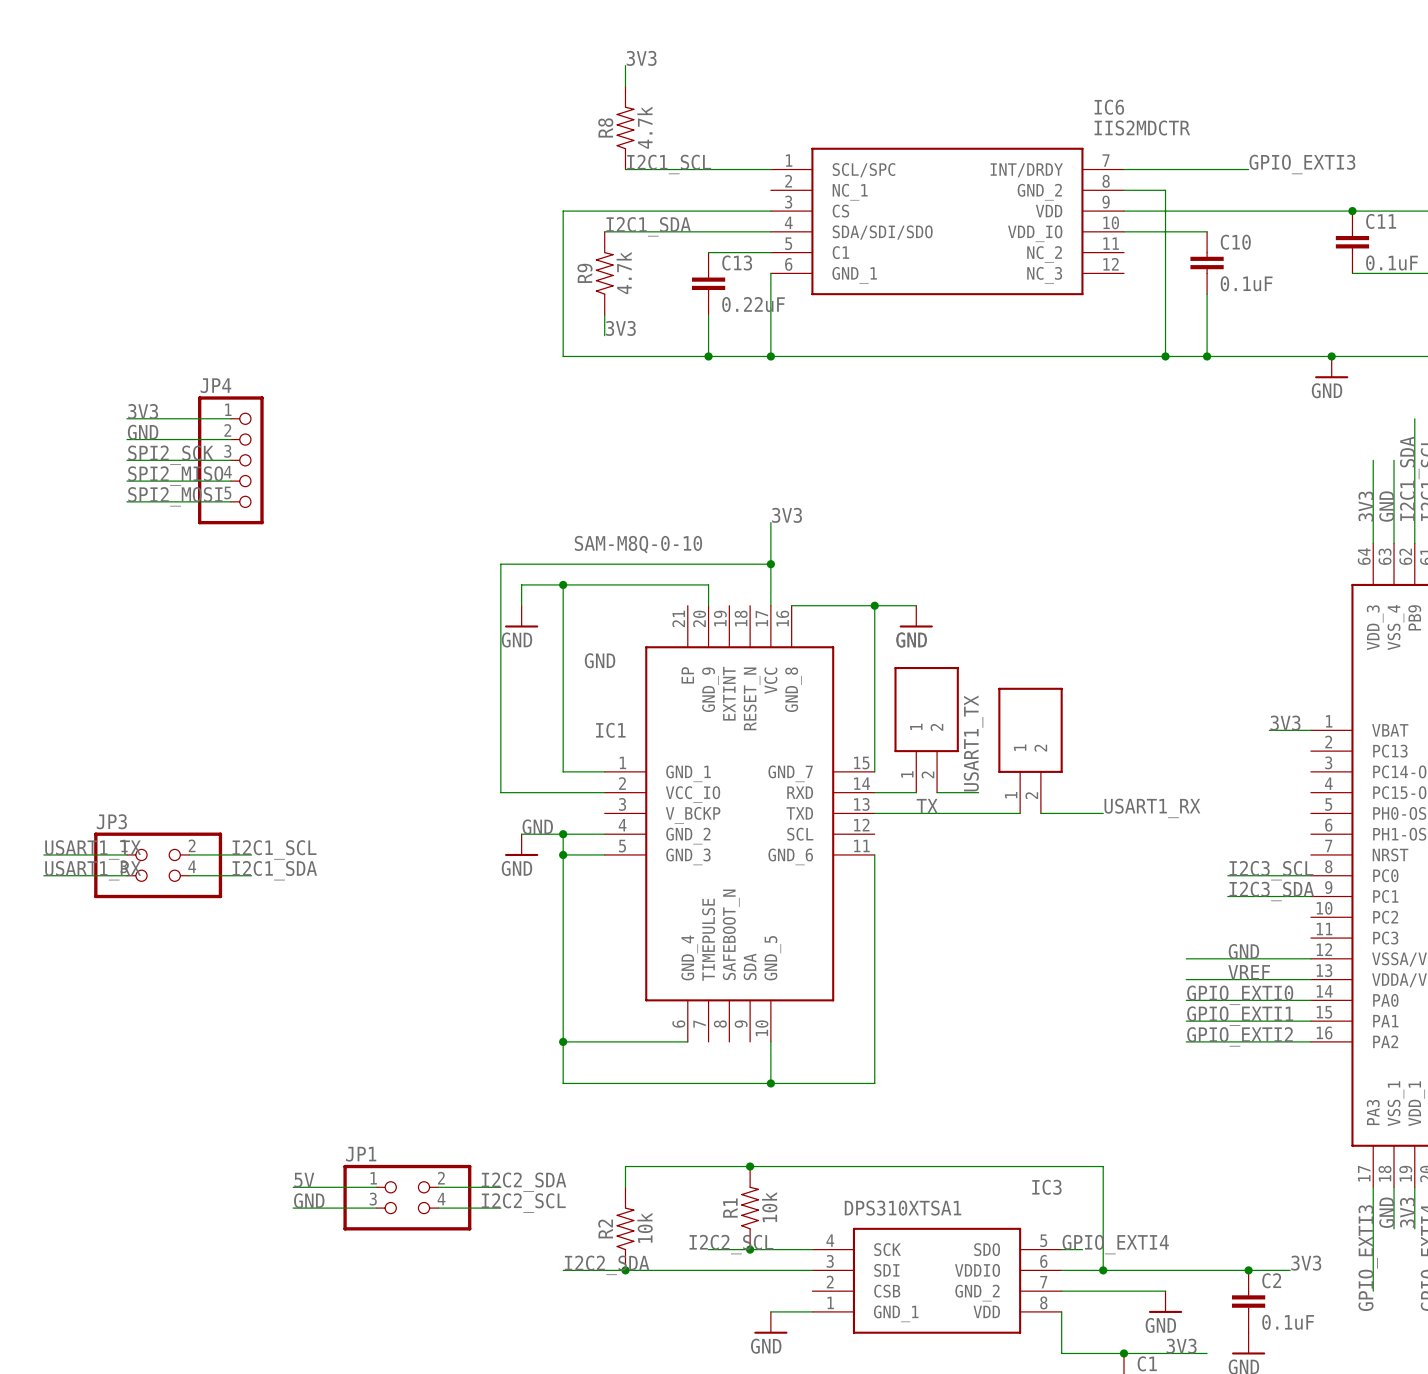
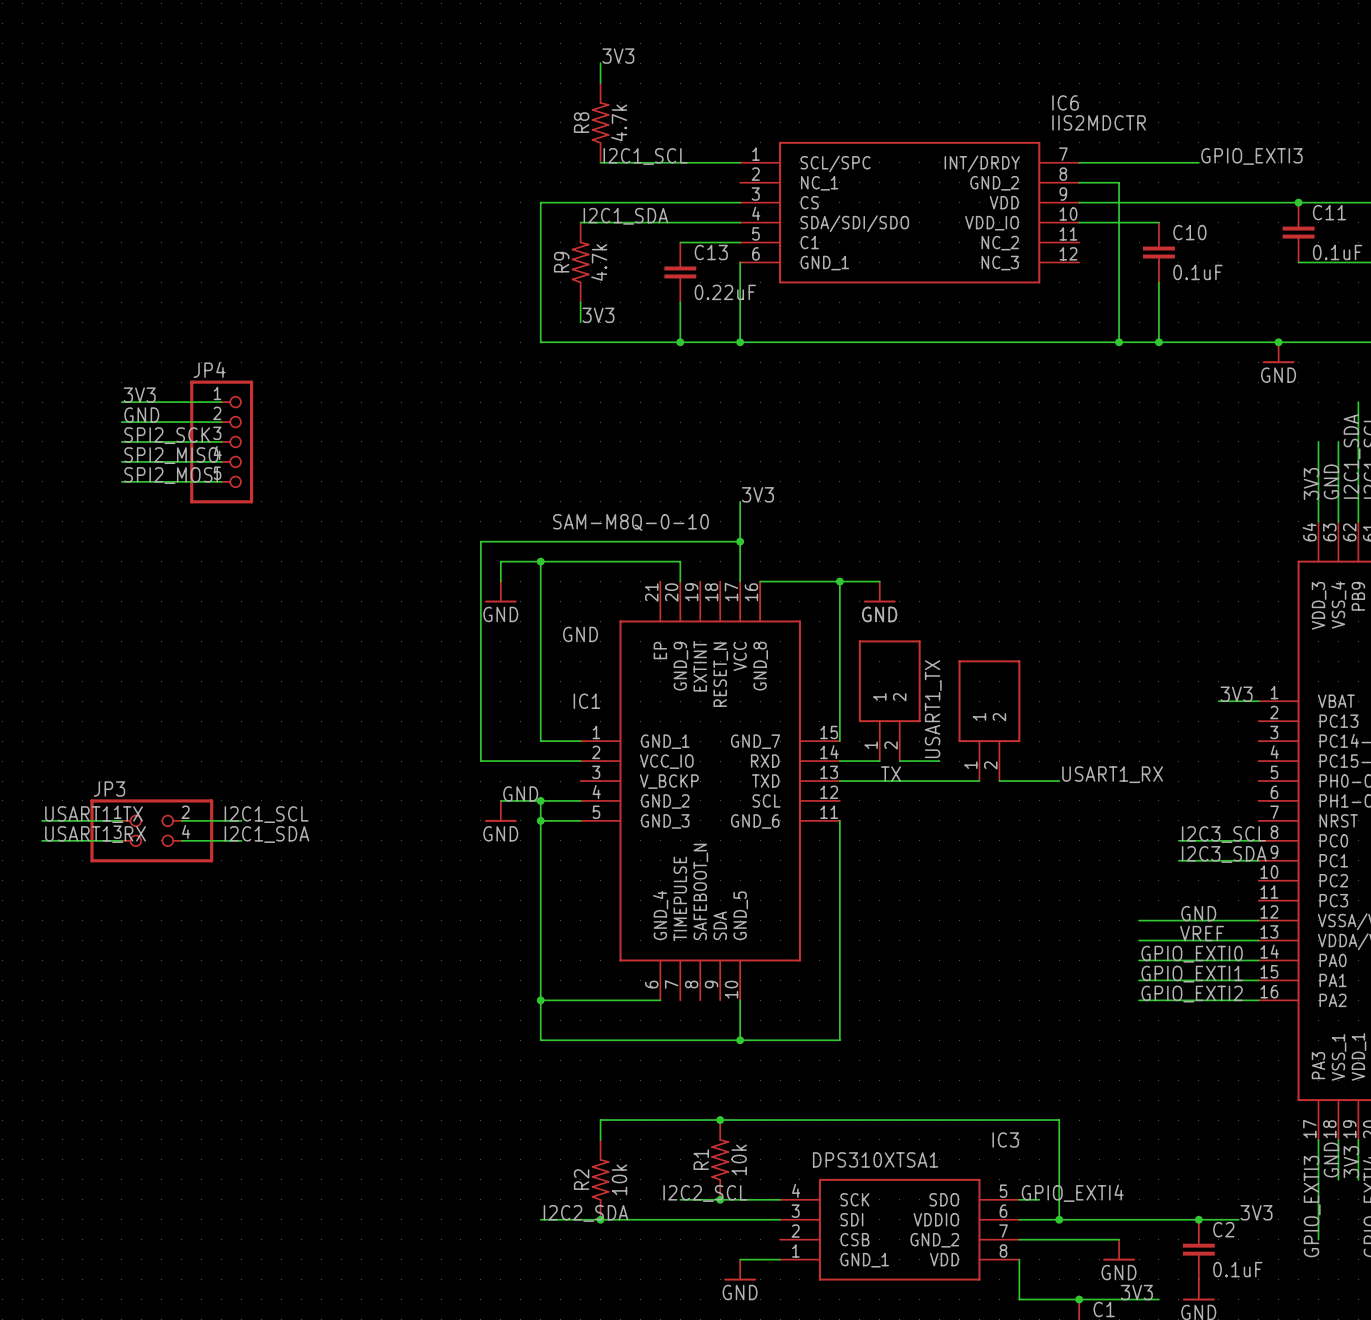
label: 5V (304, 1180) -> none
label: I2C2_SDA (524, 1182) -> none
wire: (293, 1187) (376, 1187) -> none
wire: (438, 1187) (500, 1187) -> none
JP1: (407, 1197) -> none
label: GND (309, 1200) -> none
label: I2C2_SCL (523, 1203) -> none
wire: (293, 1208) (376, 1208) -> none
wire: (438, 1208) (500, 1208) -> none

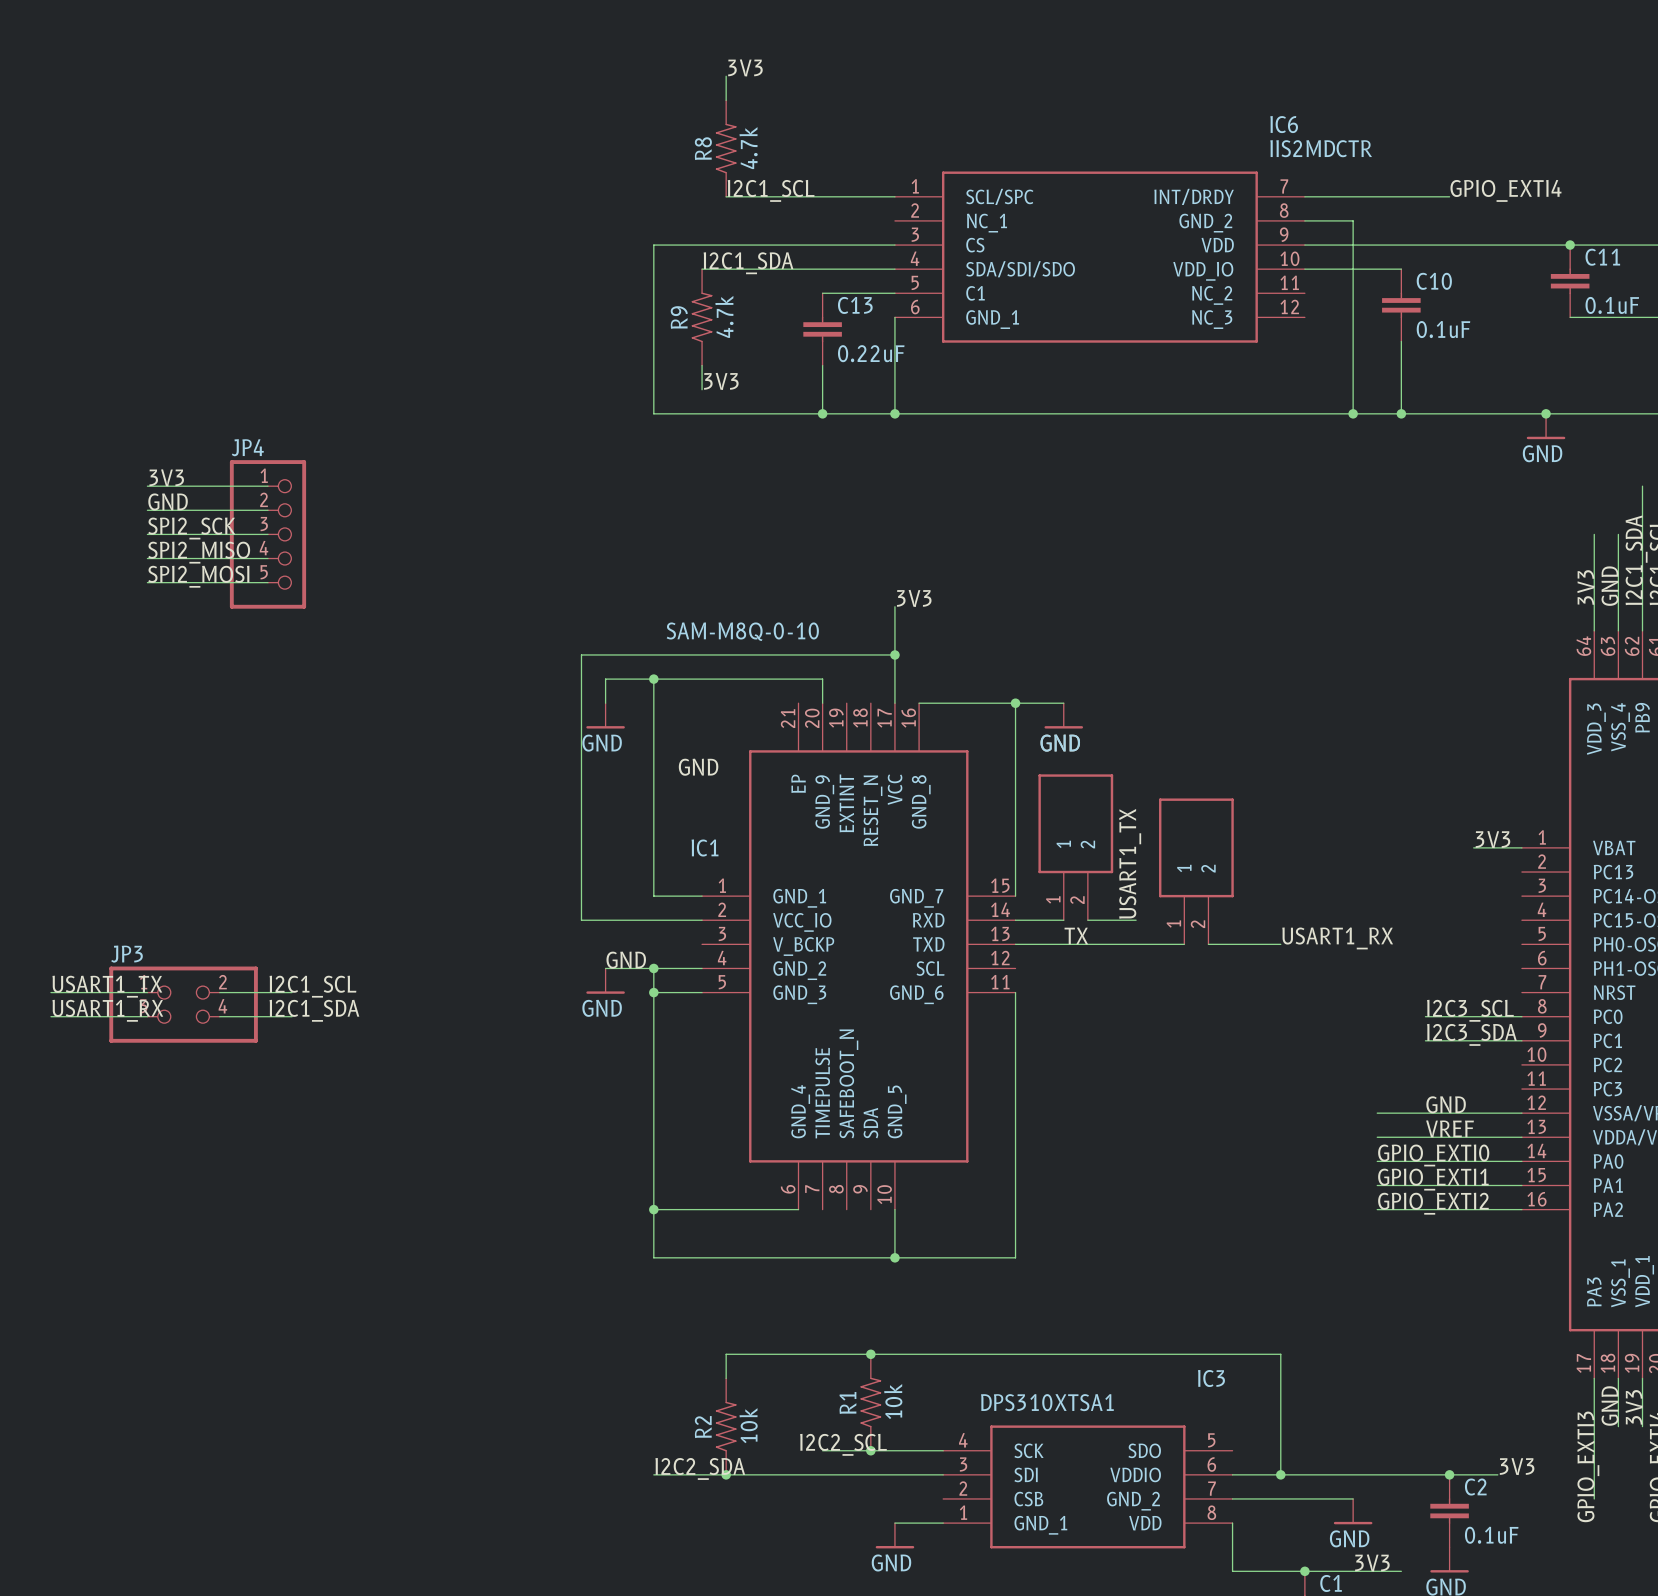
label: GPIO_EXTI3 (1251, 156) -> GPIO_EXTI4 (1505, 190)
label: GPIO_EXTI4 (1072, 1193) -> none
wire: (1019, 1199) (1039, 1199) -> none

